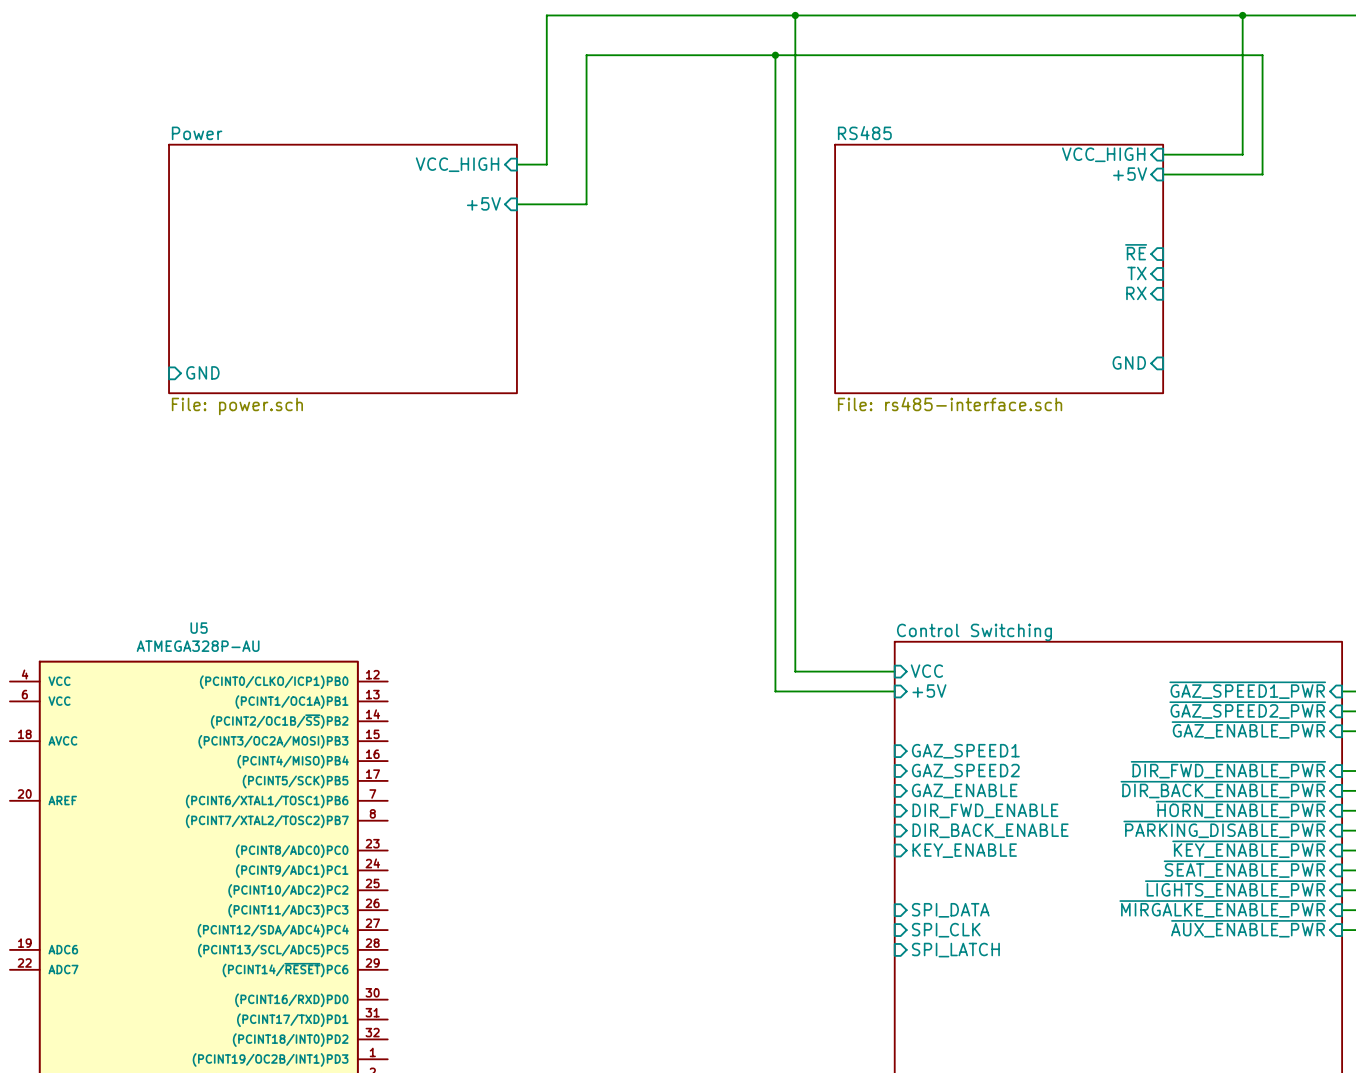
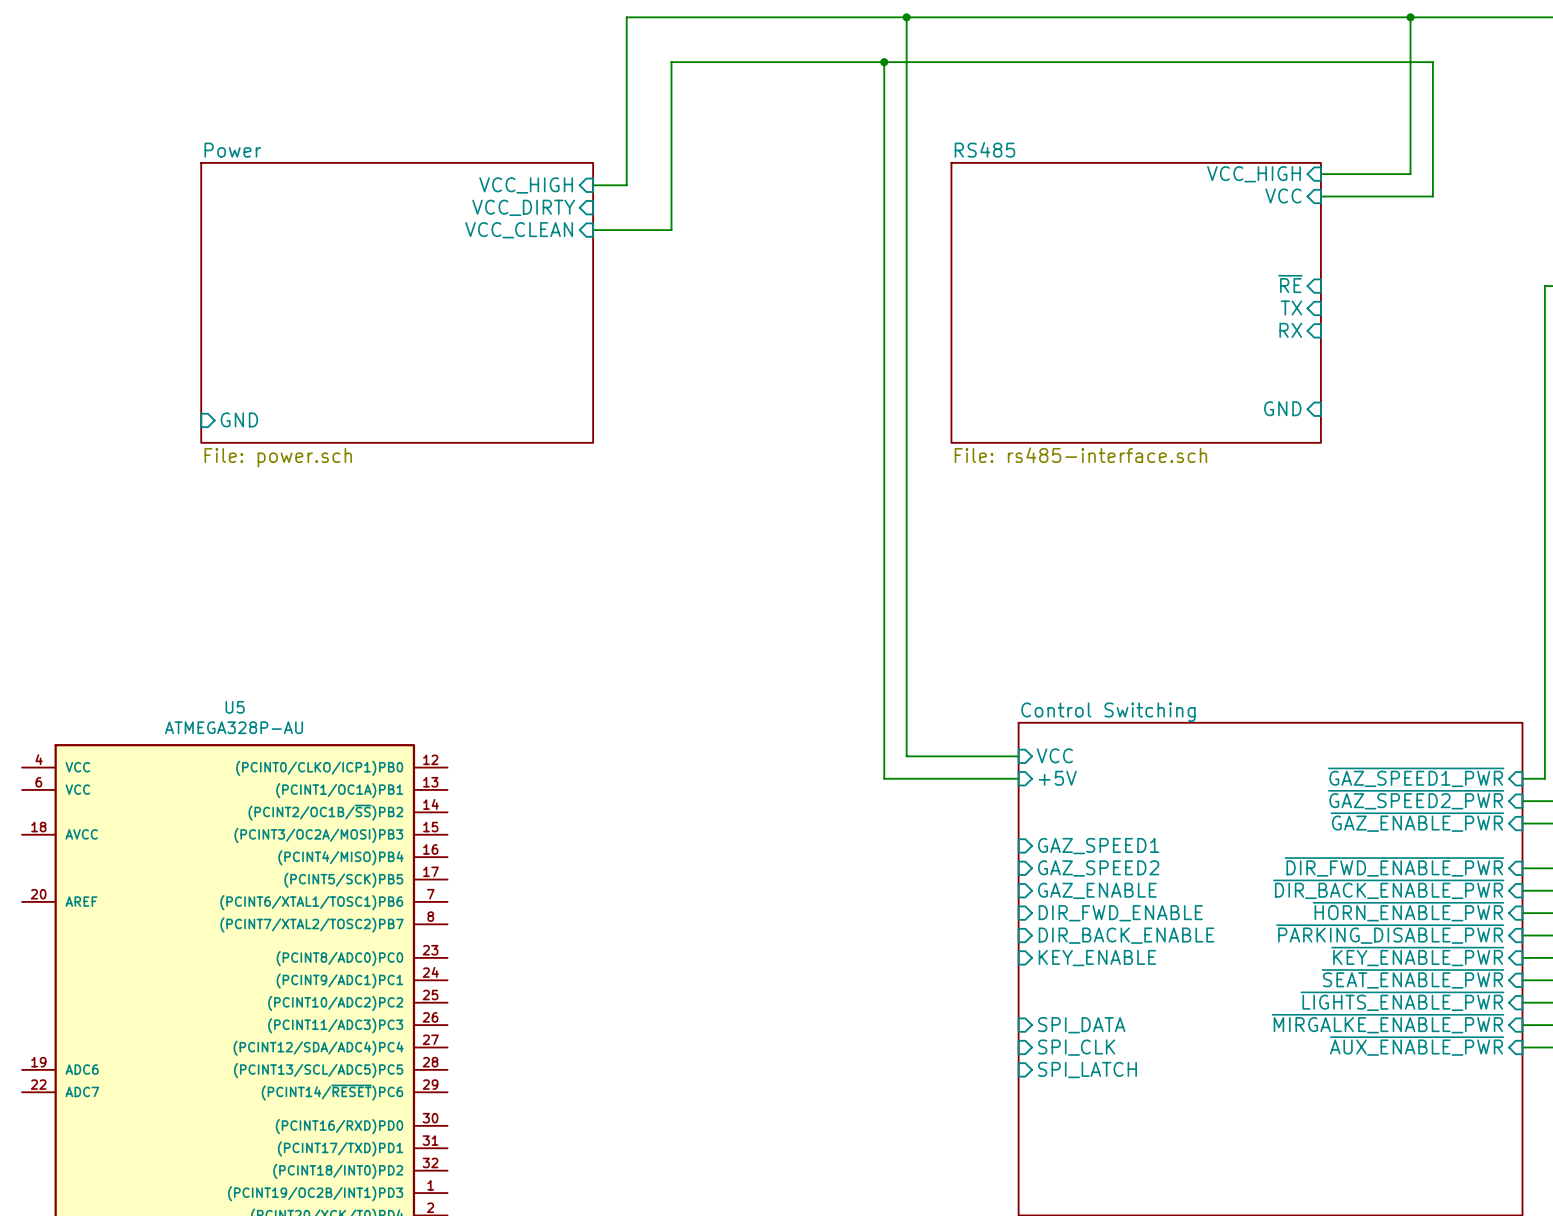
sheet pin: +5V (1130, 174) -> VCC (1283, 196)
sheet pin: none -> VCC_DIRTY (523, 207)
sheet pin: +5V (483, 203) -> VCC_CLEAN (519, 230)

